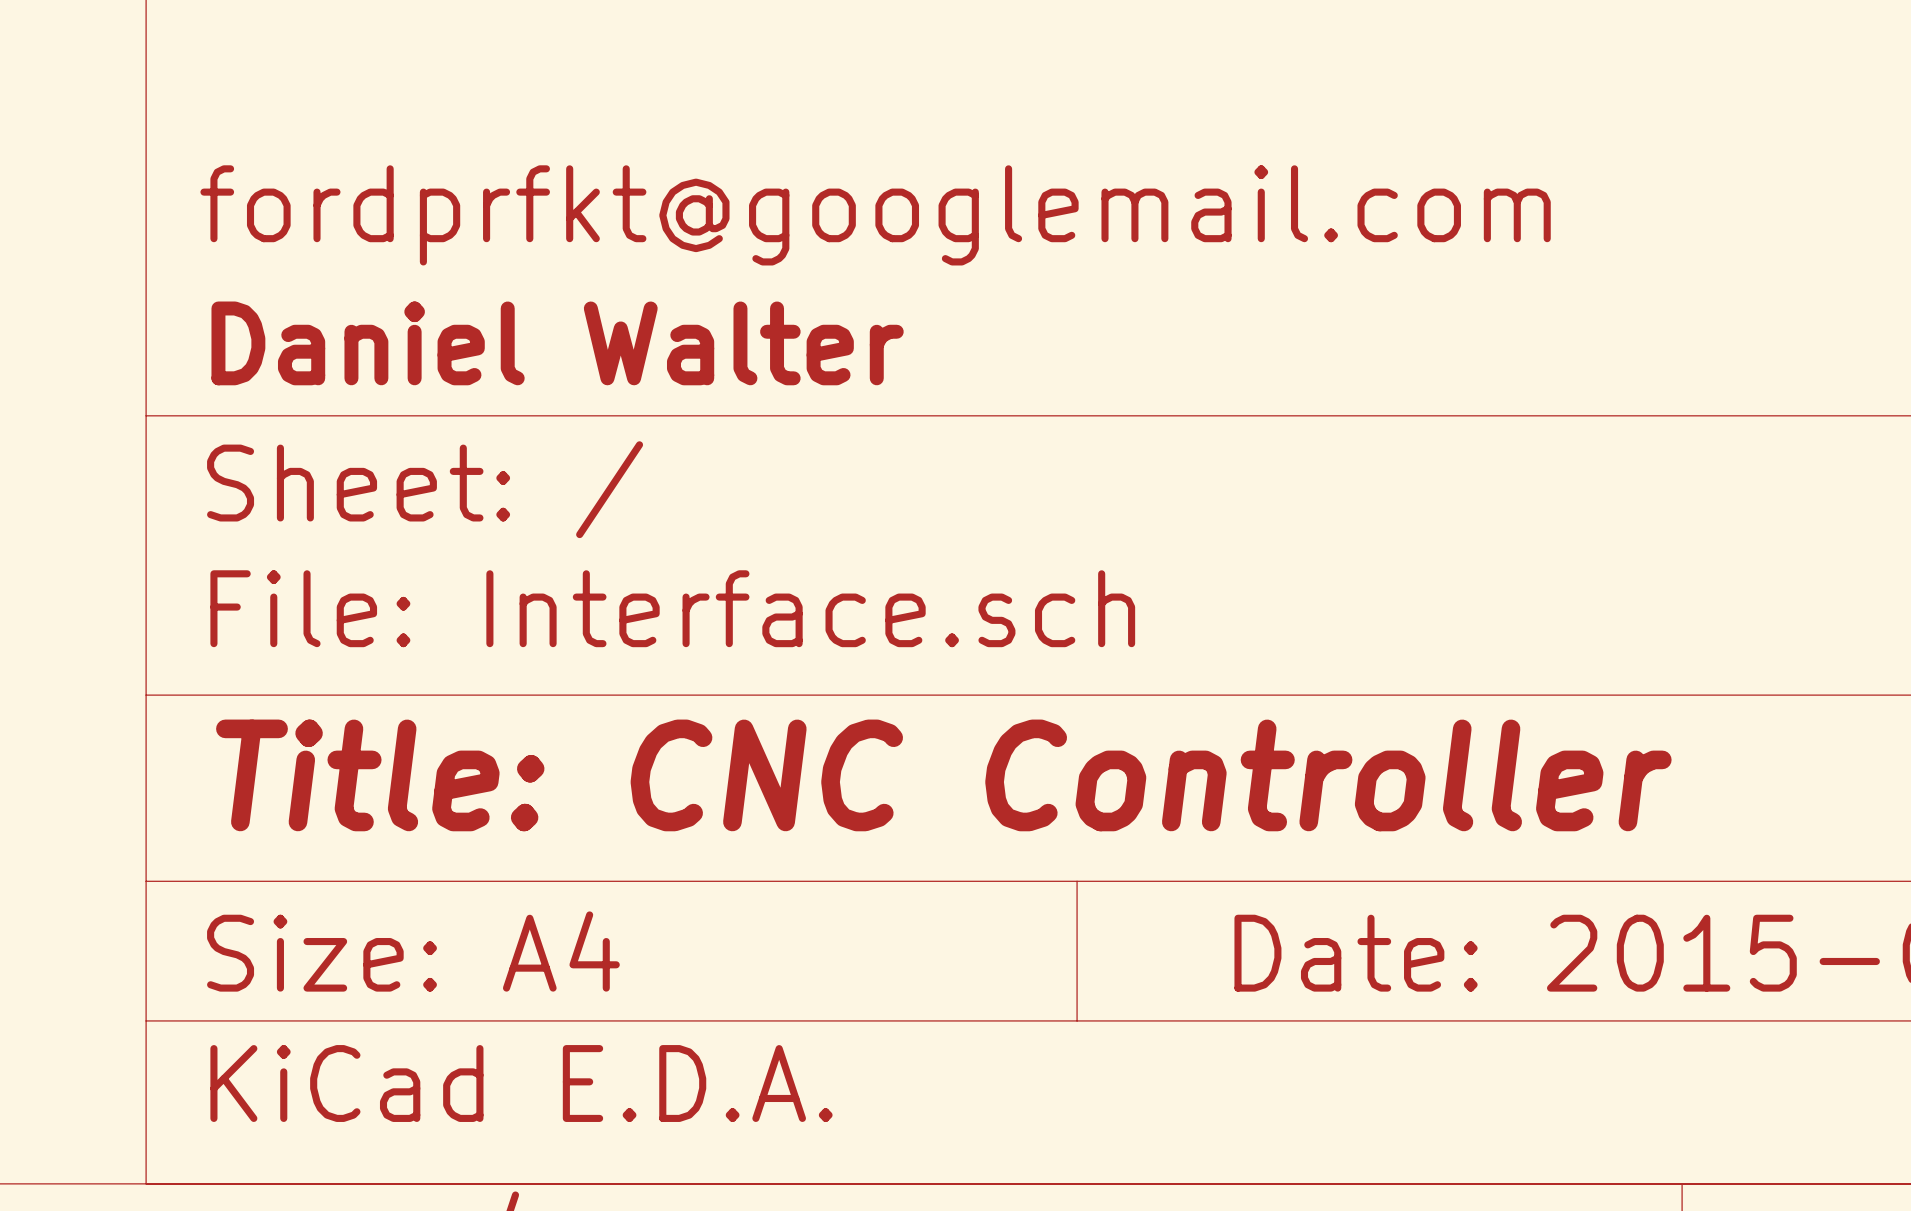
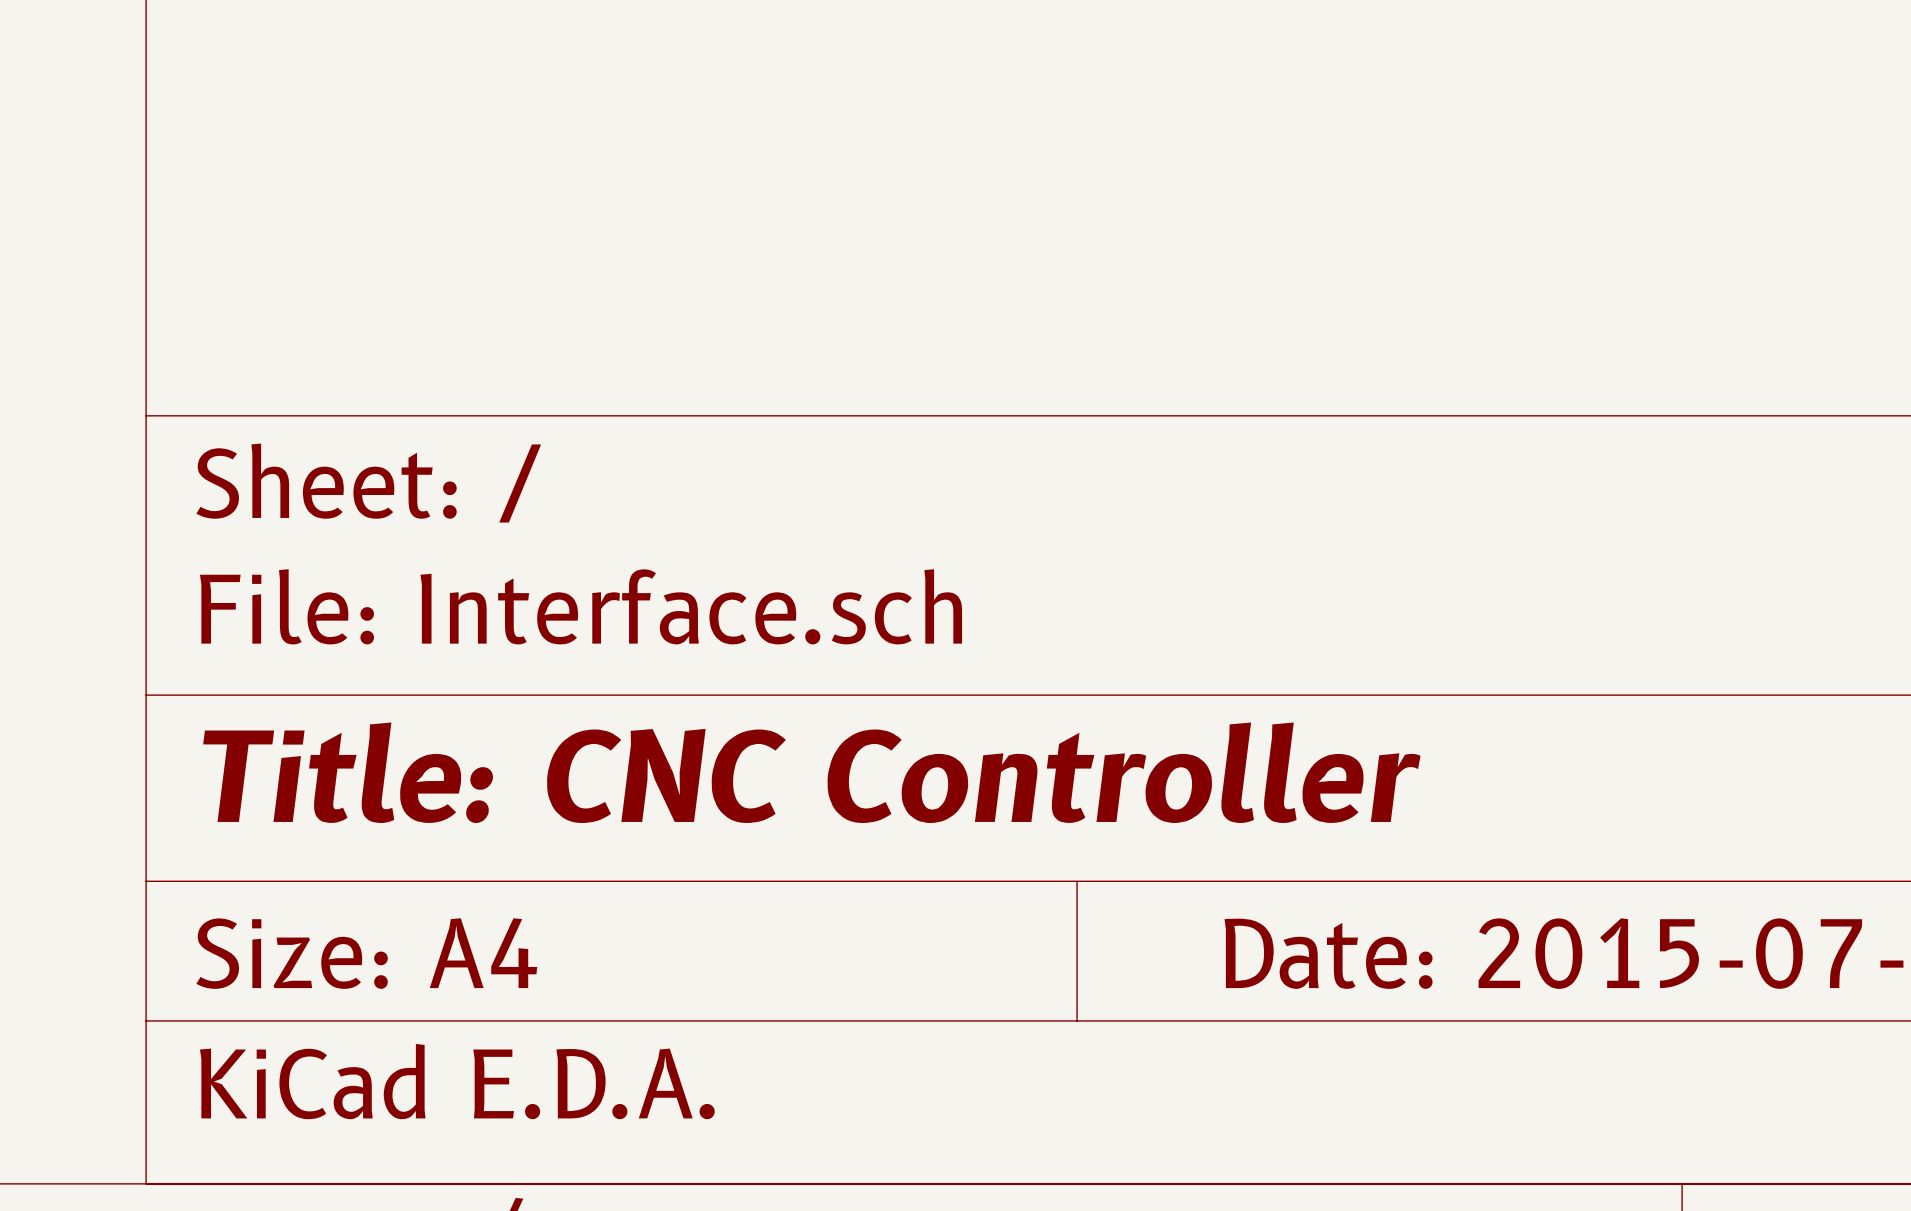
title block: fordprfkt@googlemail.com (875, 215) -> none
title block: Daniel Walter (557, 343) -> none

